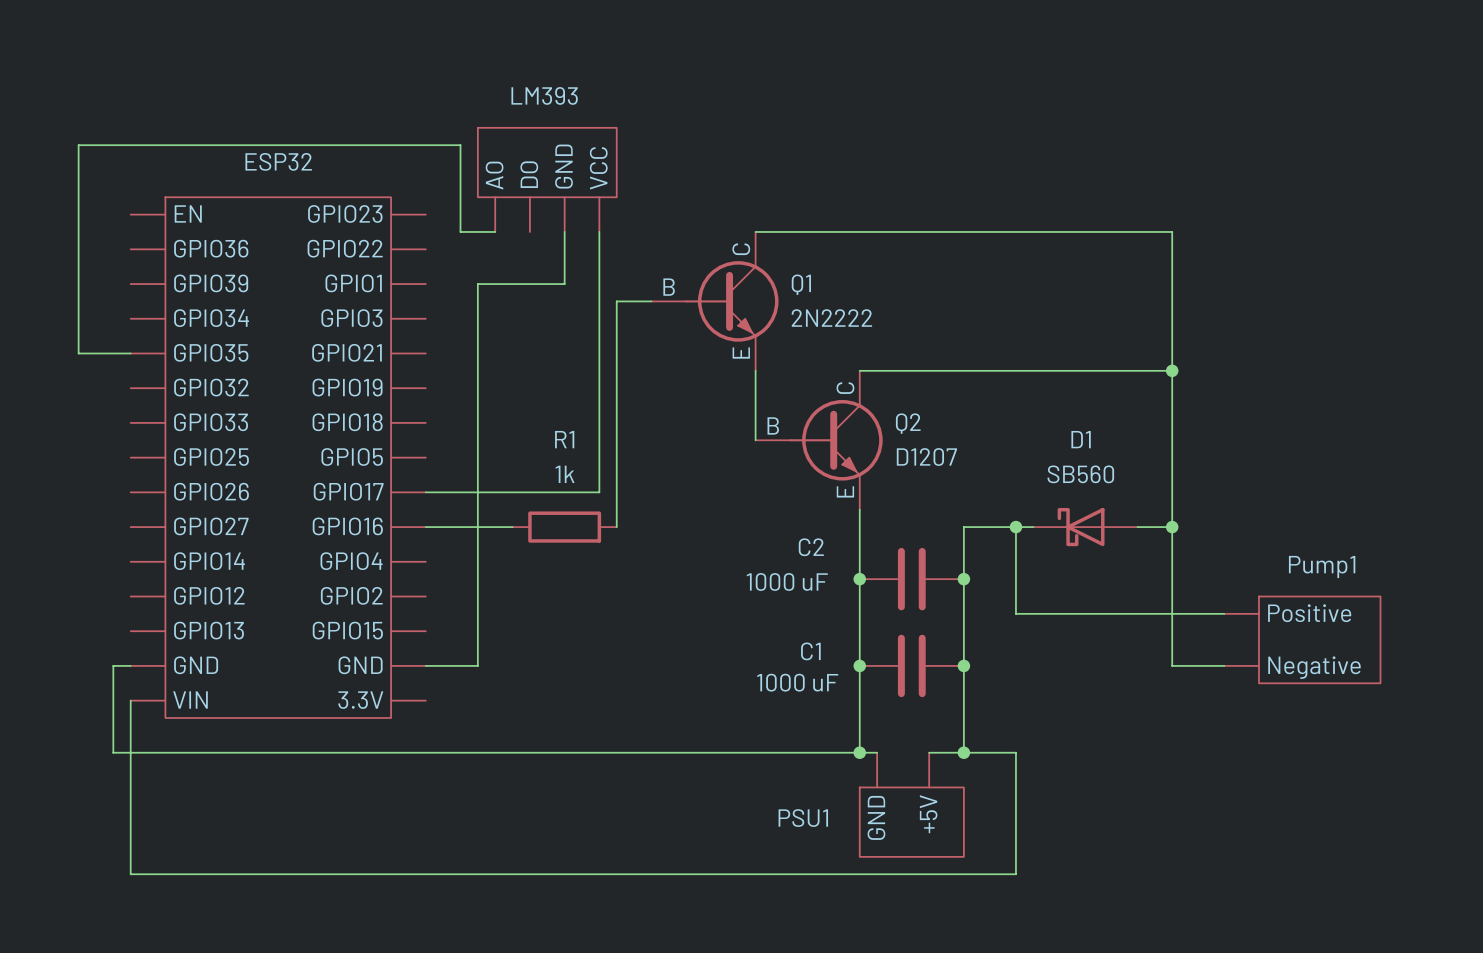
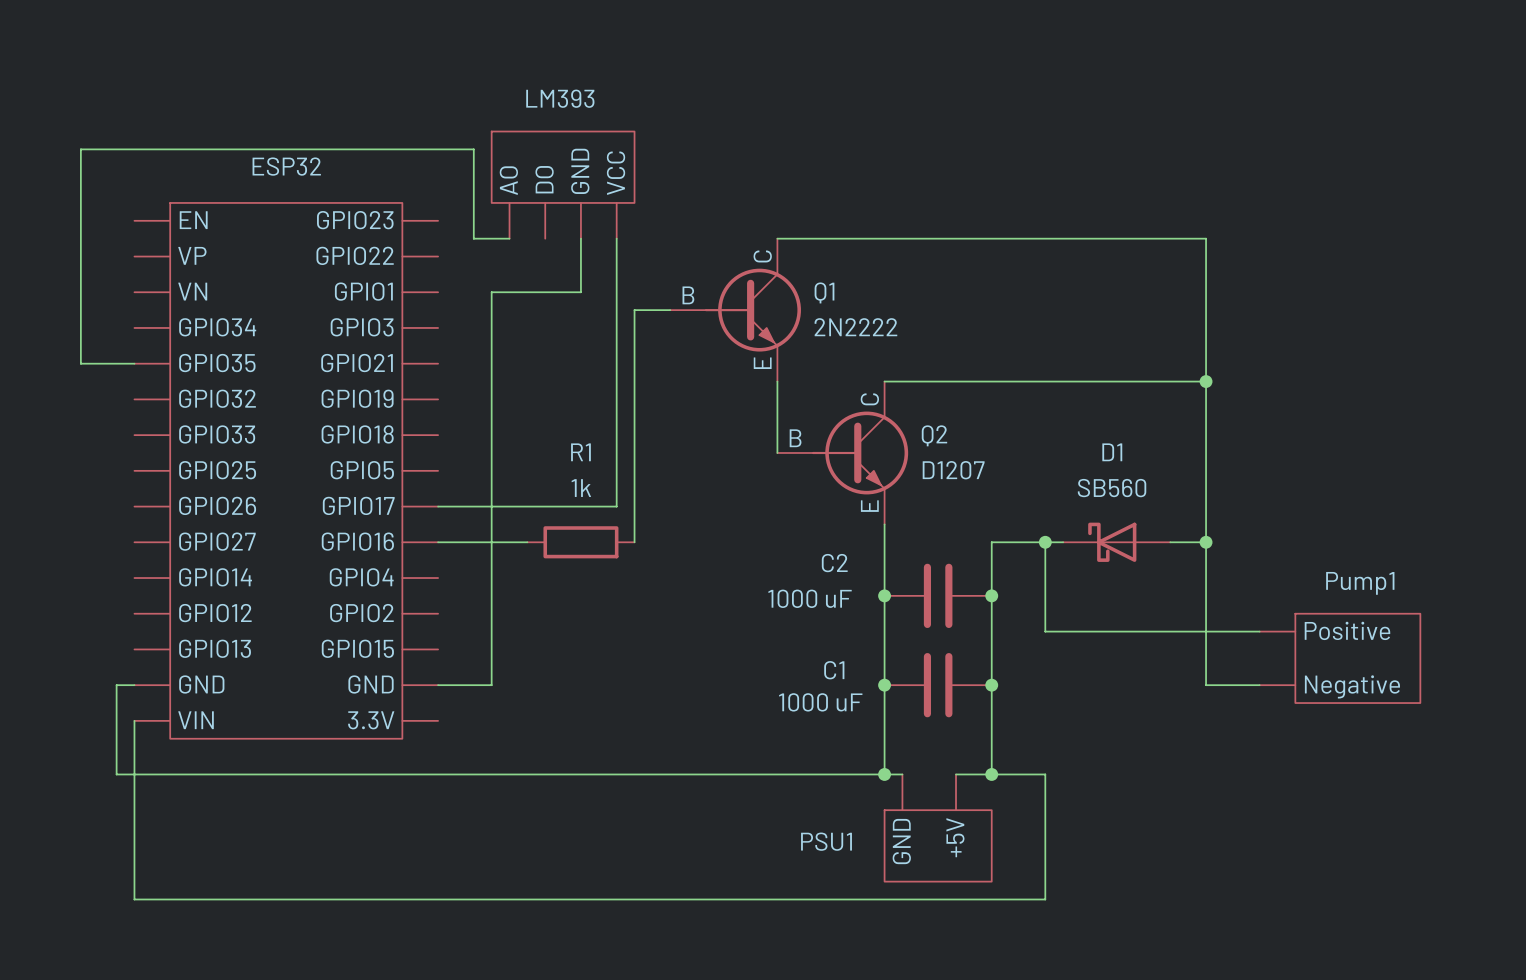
ESP32 pin name: GPIO36 (211, 248) -> VP (192, 255)
ESP32 pin name: GPIO39 (211, 283) -> VN (192, 291)

